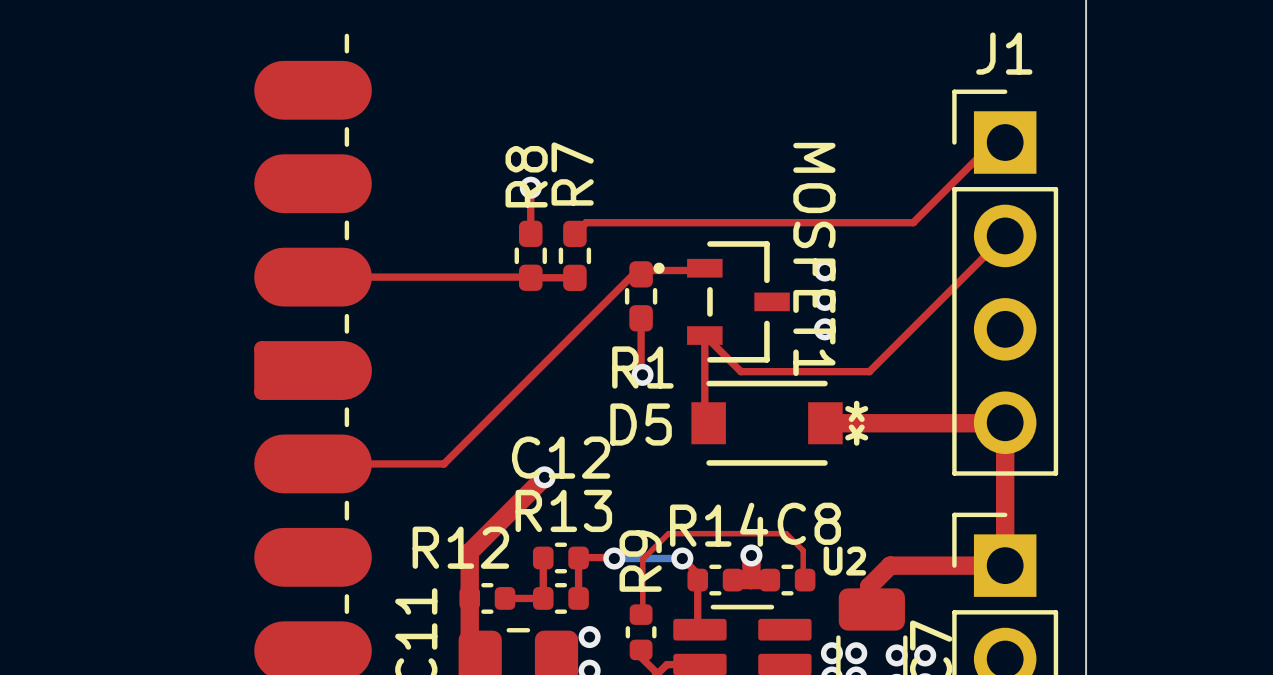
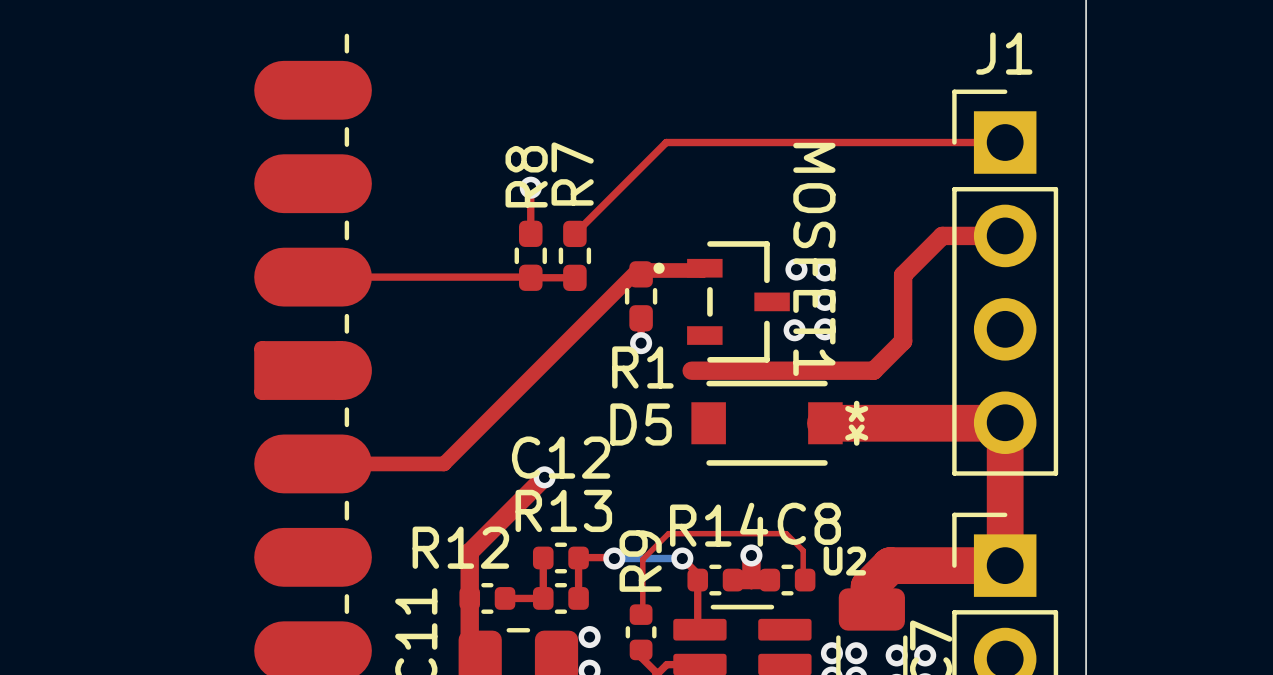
top track: (993, 142) (913, 222) (586, 222) -> (993, 142) (666, 142) (586, 222)
top track: (1005, 235) (869, 371) (740, 371) (704, 335) (704, 419) (708, 423) -> (1005, 235) (942, 235) (903, 275) (903, 341) (873, 370) (691, 370)
top track width: thin (704, 268) (702, 270) (637, 270) (443, 463) (313, 463) -> thick (704, 268) (702, 270) (637, 270) (443, 463) (313, 463)
via: none -> (796, 269)
via: none -> (794, 330)
top track: (641, 343) (641, 373) -> none
via position: (642, 374) -> (641, 343)
top track width: thin (1005, 422) (1005, 565) (890, 565) (869, 586) (869, 609) -> thick (1005, 422) (1005, 565) (890, 565) (869, 586) (869, 609)
top track width: thin (825, 423) (1004, 423) -> thick (825, 423) (1004, 423)

